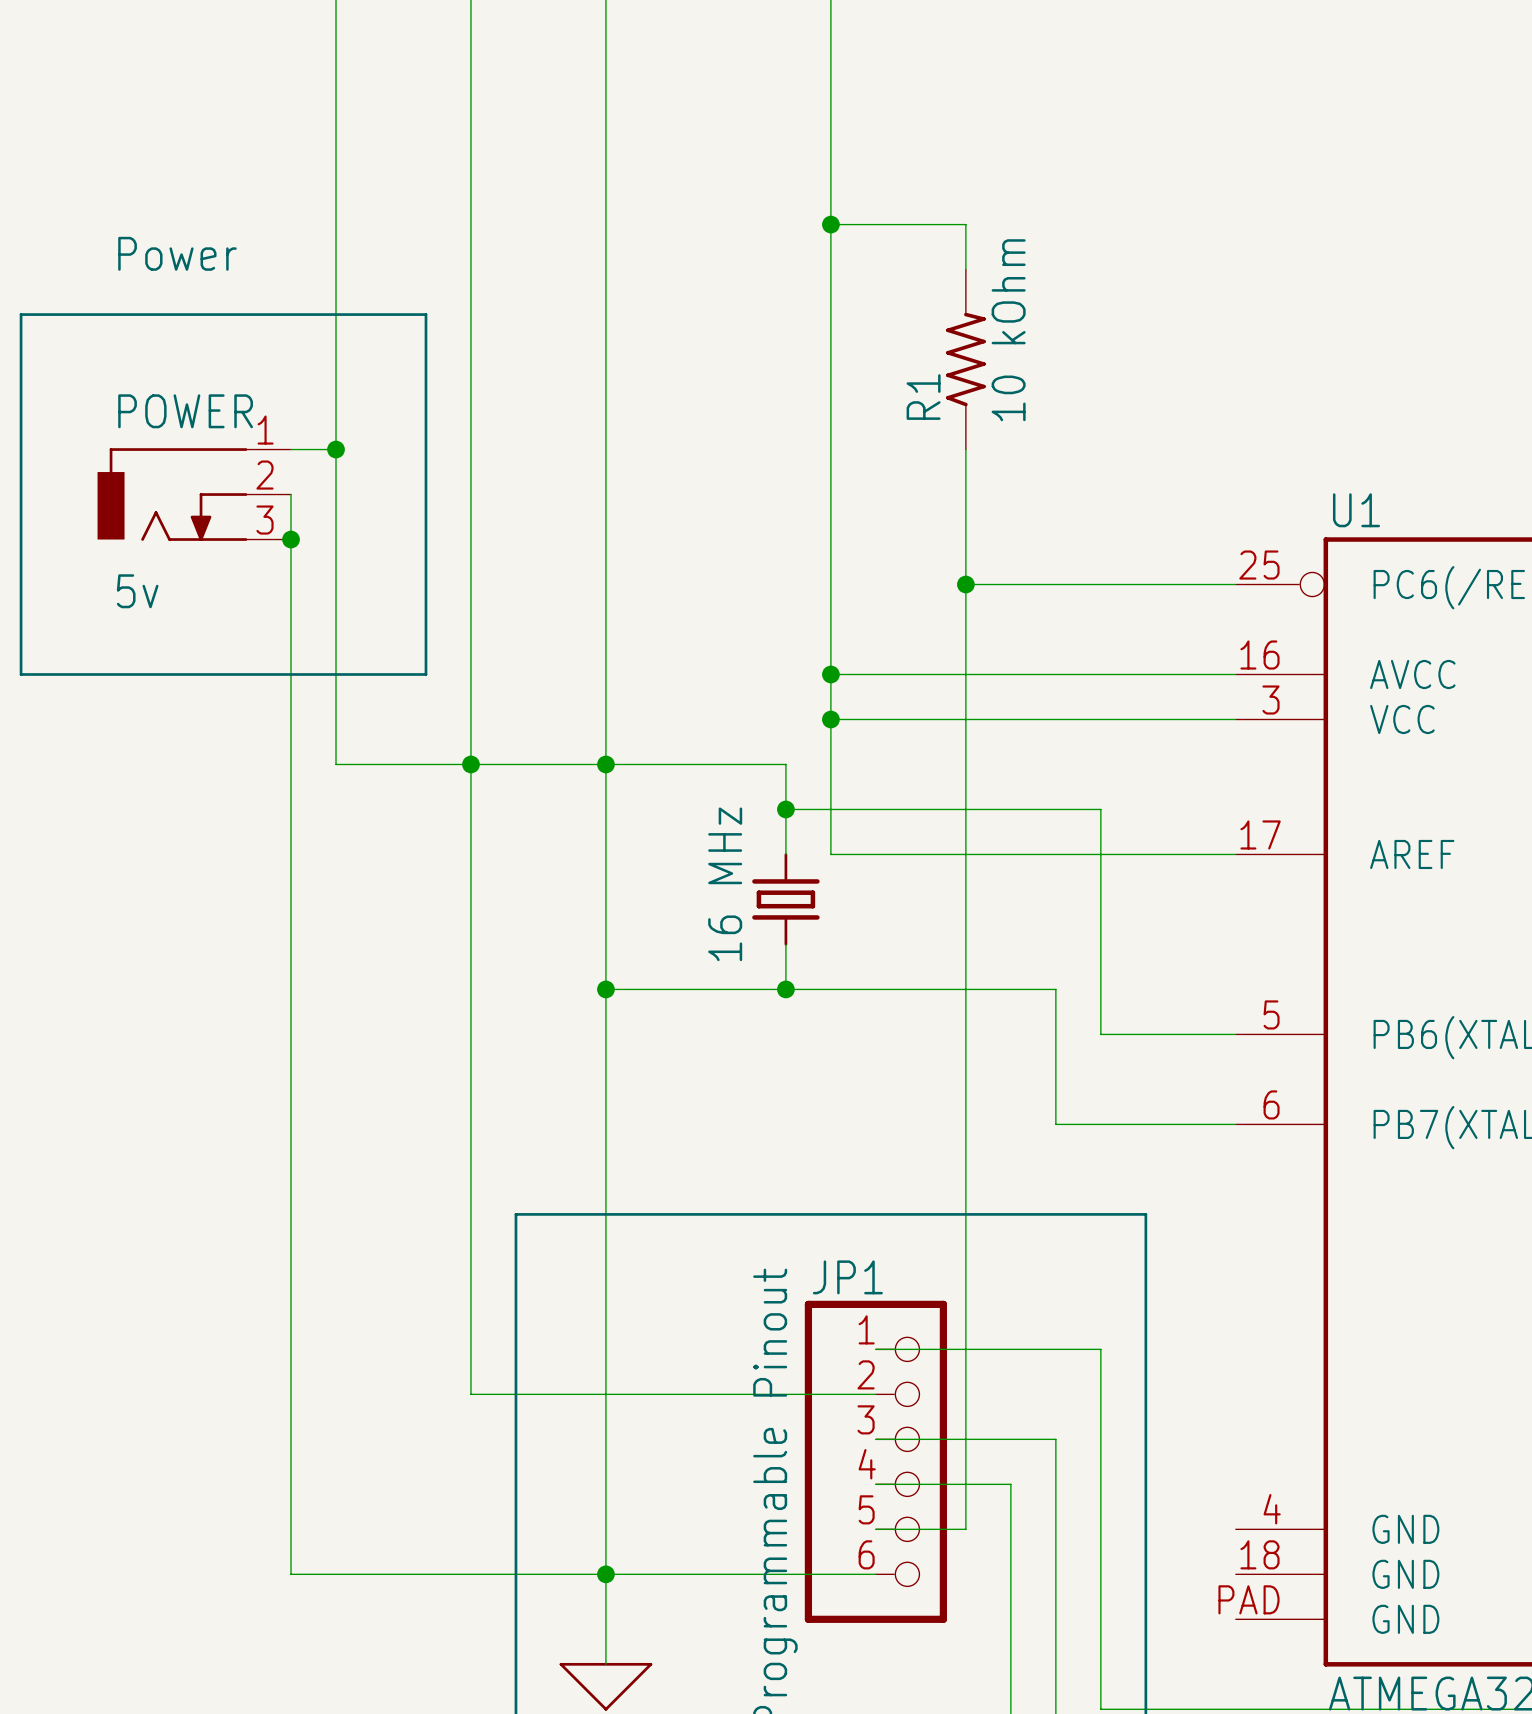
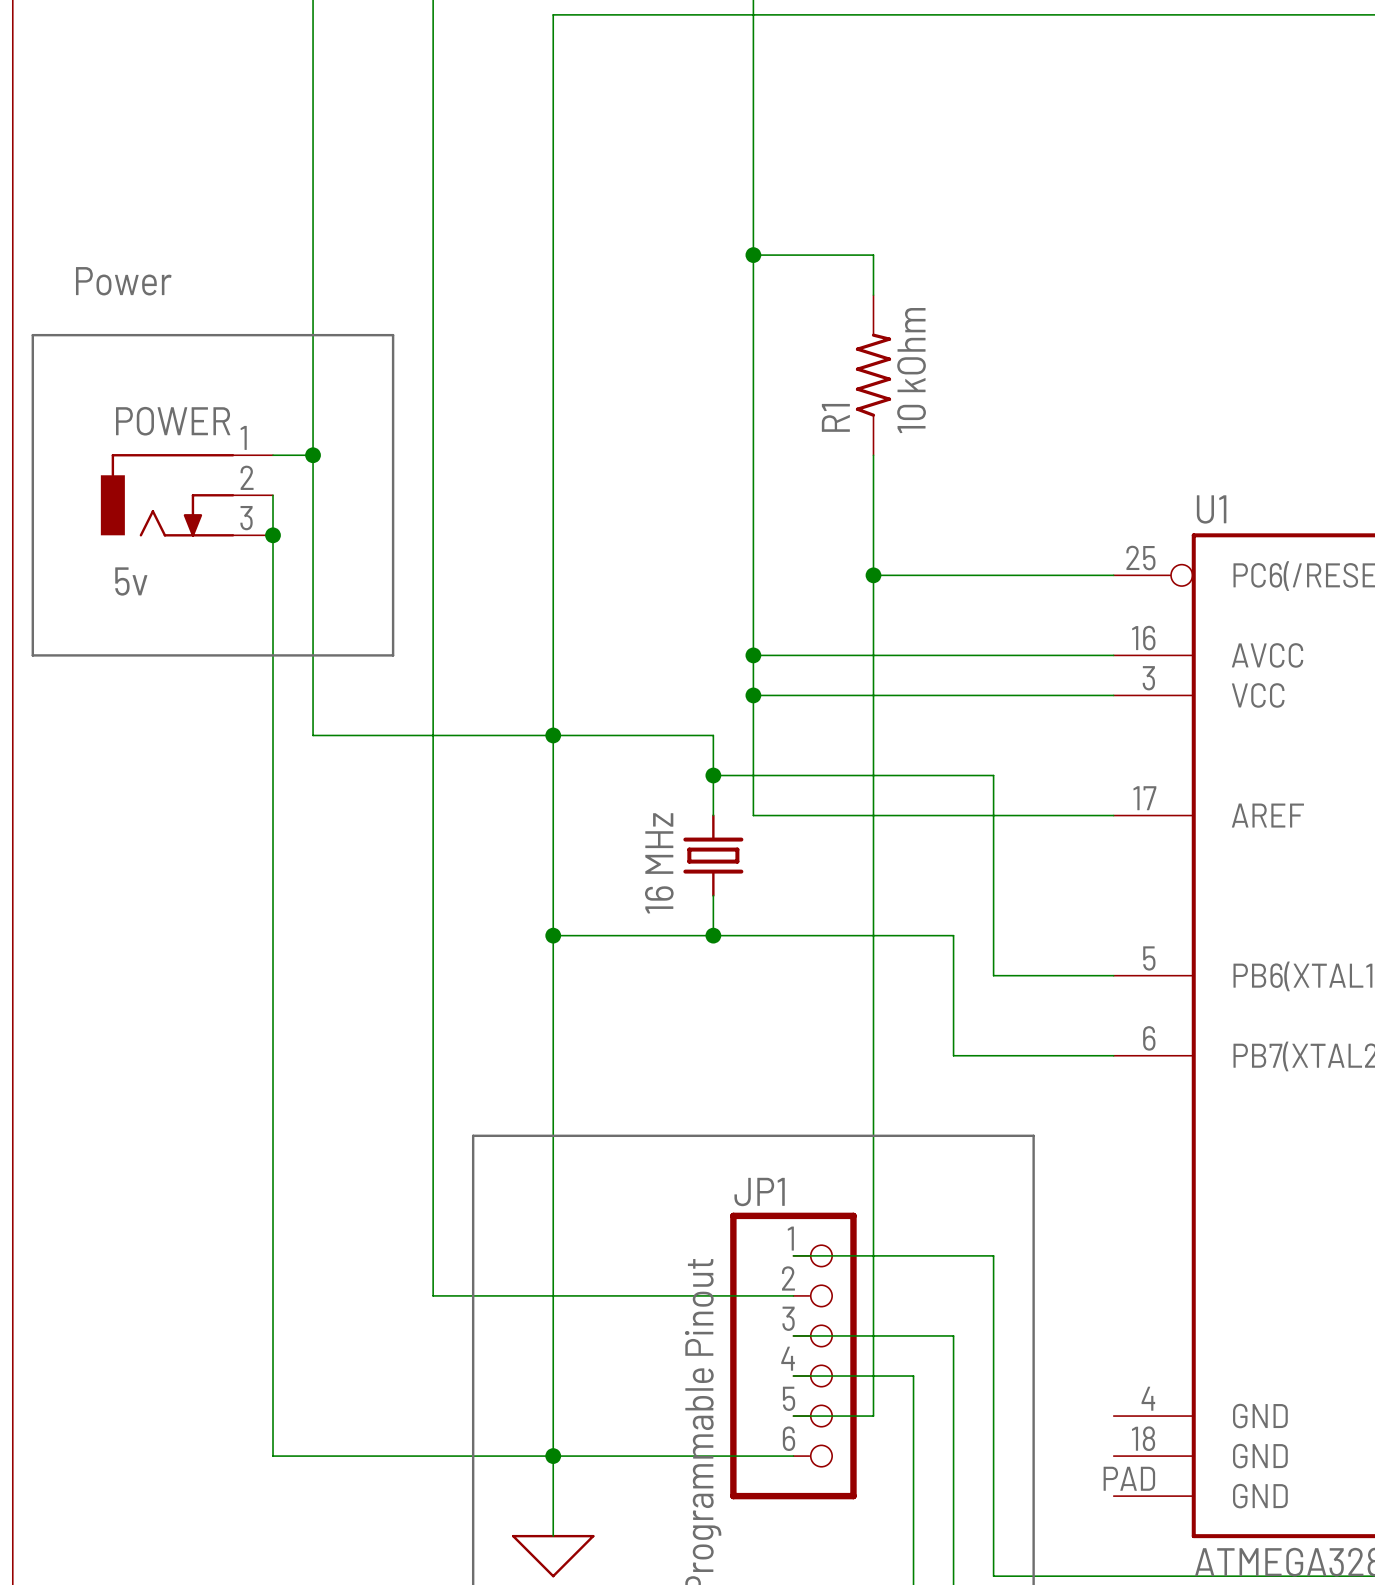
text position: Power (177, 253) -> Power (123, 281)
junction: (470, 764) -> none

